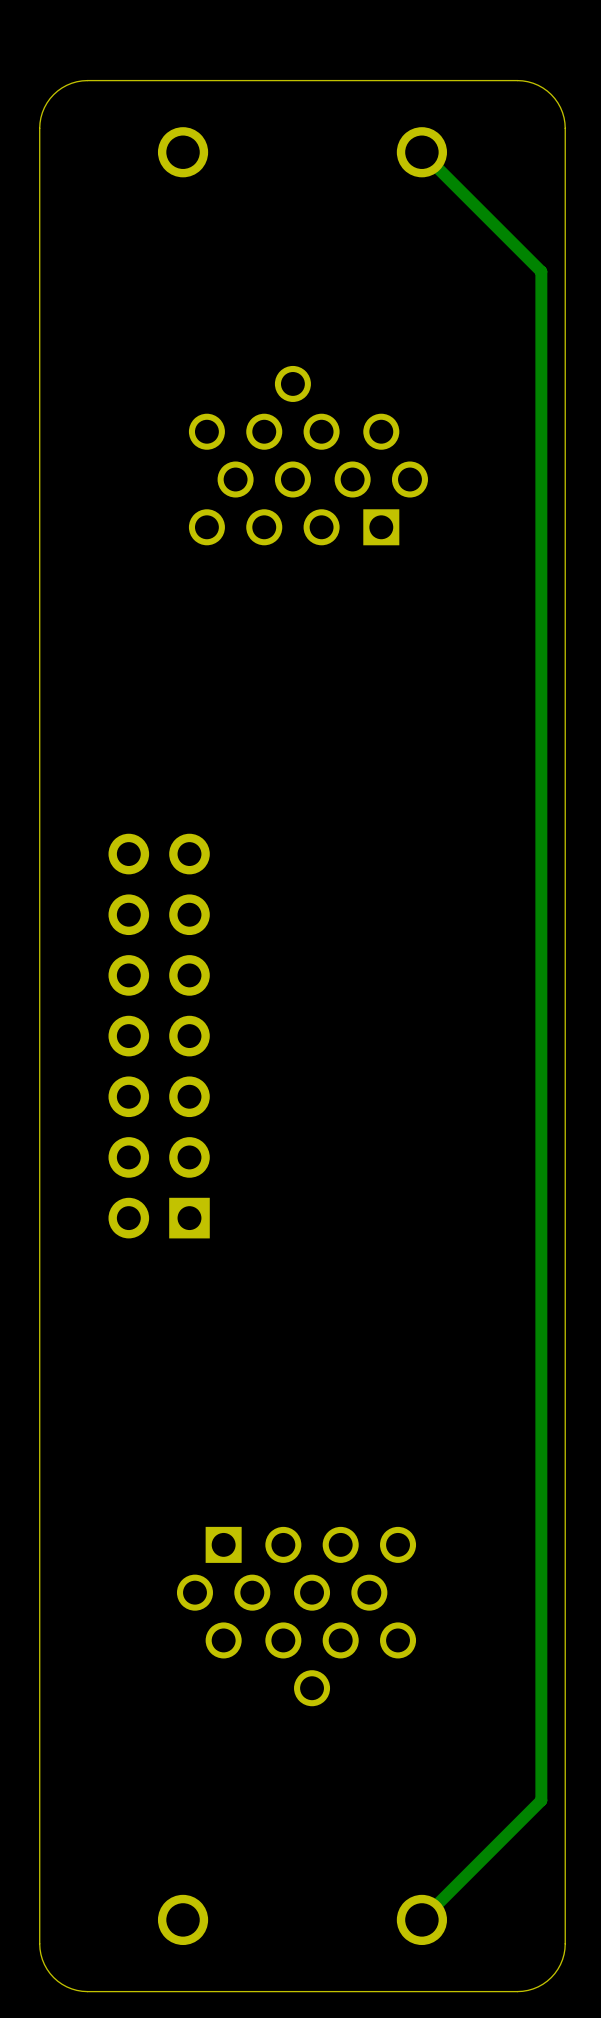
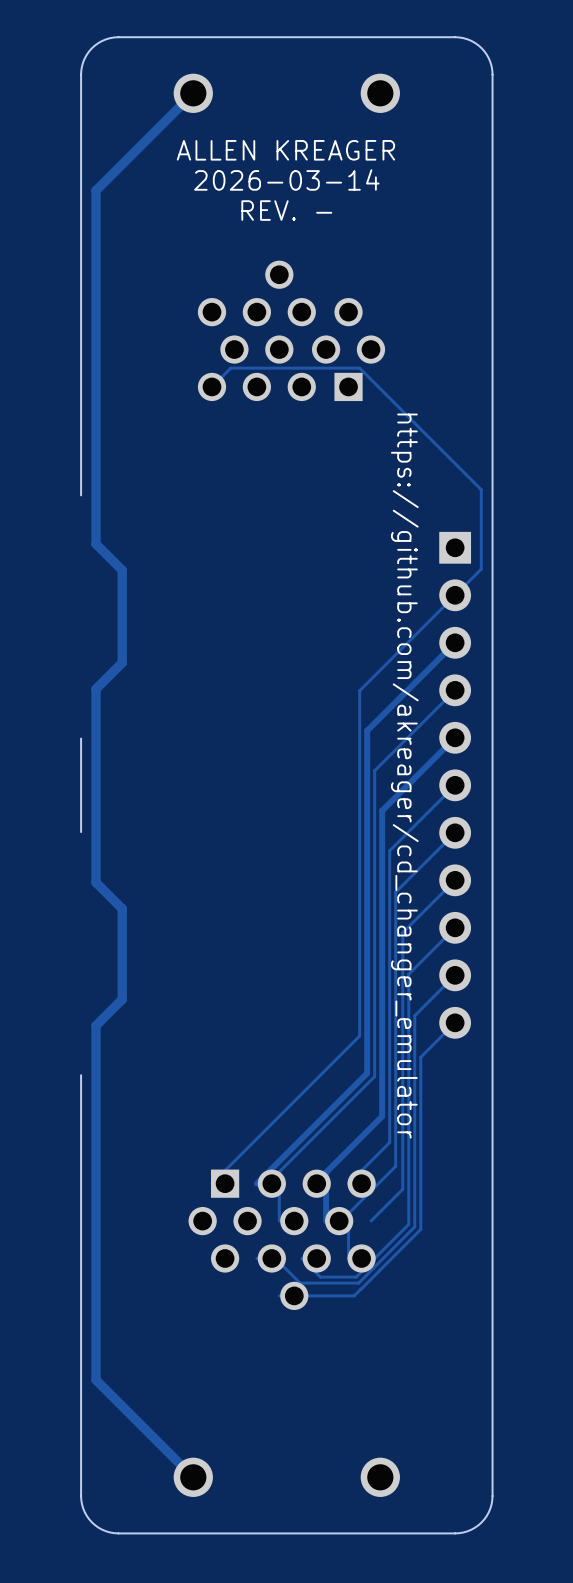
track: none -> (193, 93) (96, 190) (96, 544) (122, 570) (122, 662) (96, 688) (96, 882) (122, 908) (122, 999) (96, 1025) (96, 1380) (193, 1477)
track: (421, 152) (541, 271) (541, 1800) (421, 1919) -> none
text: none -> ALLEN KREAGER (285, 150)
text: none -> 2026-03-14 (286, 179)
text: none -> REV. - (286, 210)
track: none -> (212, 386) (230, 368) (359, 368) (481, 489) (481, 569) (359, 690) (359, 1036) (212, 1183)
board edge: (39, 665) (39, 976) -> none
track: none -> (455, 642) (367, 730) (367, 1073) (256, 1183)
track: none -> (455, 690) (374, 770) (374, 1076) (279, 1171) (279, 1221)
track: none -> (455, 737) (382, 810) (382, 1116) (326, 1172) (326, 1221)
part: (159, 1036) -> none
track: none -> (455, 785) (389, 850) (389, 1142) (348, 1183)
part: none -> (455, 785)
text: none -> https://github.com/akreager/cd_changer_emulator (404, 776)
board edge: (39, 1095) (39, 1406) -> none
track: none -> (455, 832) (395, 892) (395, 1166) (348, 1213) (348, 1258)
track: none -> (455, 880) (402, 932) (402, 1189) (370, 1221)
track: none -> (455, 927) (408, 974) (408, 1224) (356, 1277) (320, 1277) (301, 1258)
track: none -> (455, 975) (414, 1015) (414, 1226) (358, 1283) (300, 1283) (275, 1258) (256, 1258)
track: none -> (455, 1022) (420, 1057) (420, 1229) (361, 1289)
track: none -> (360, 1289) (354, 1295) (279, 1295)

